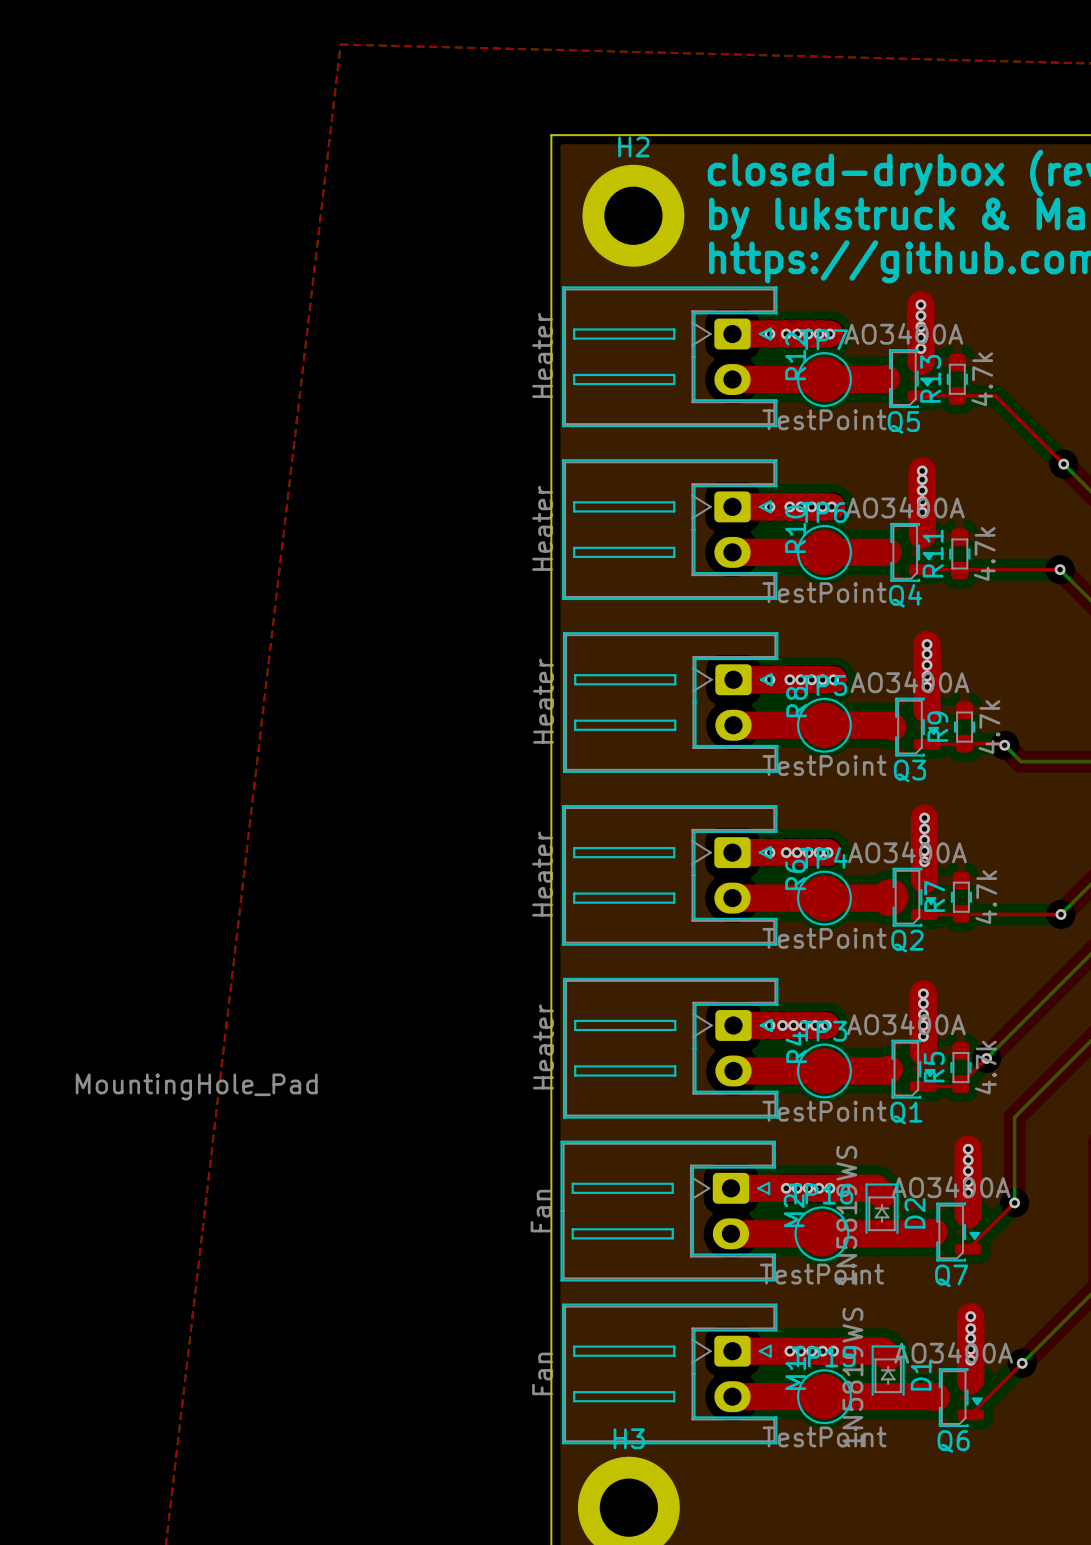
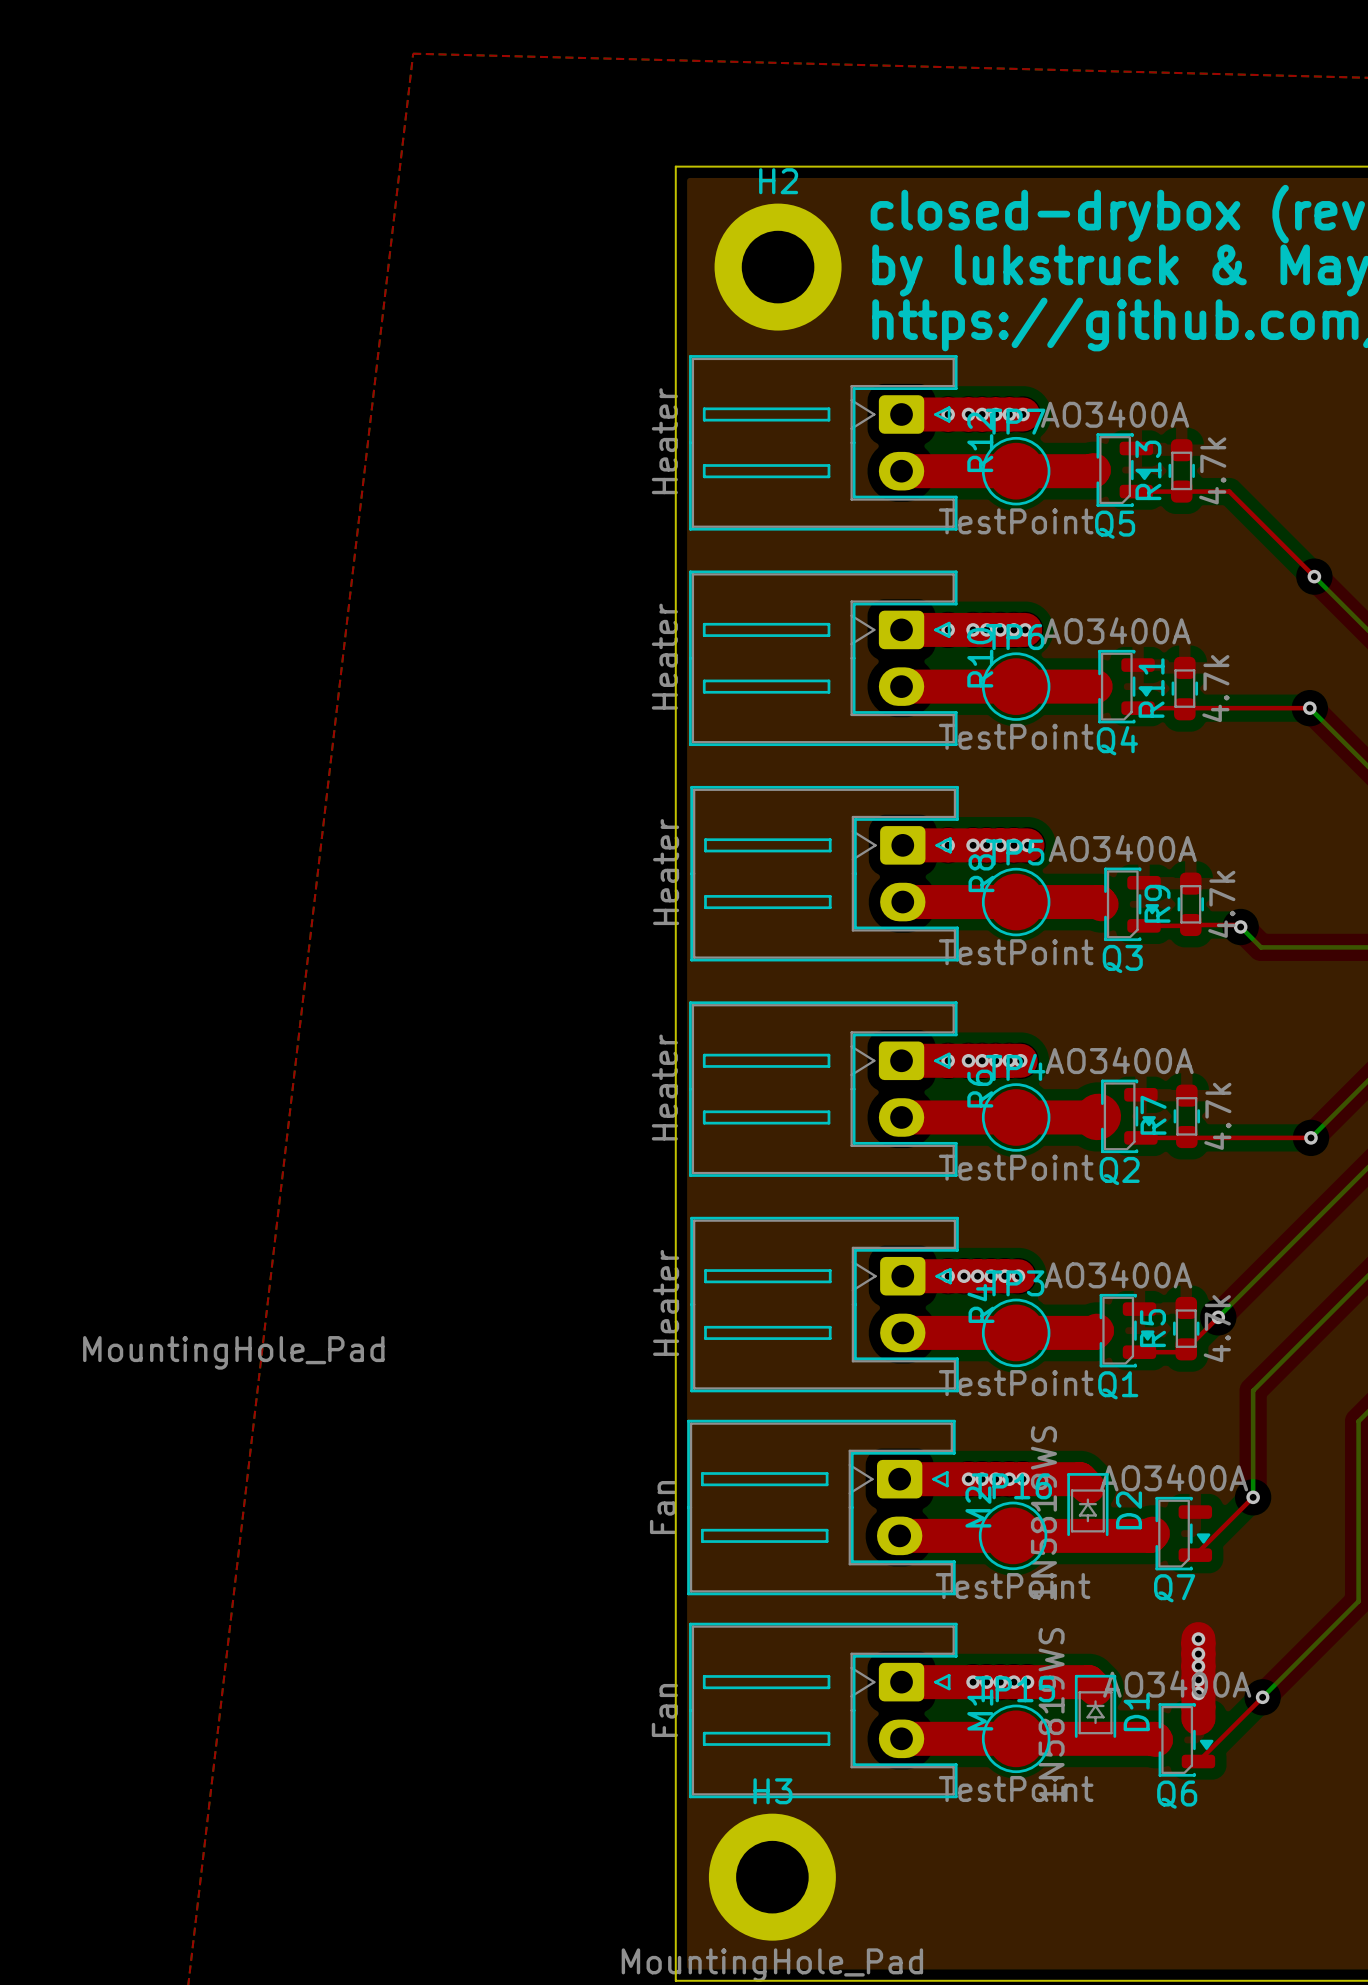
top track: (920, 304) (920, 361) -> none
via: (920, 304) -> none
via: (920, 315) -> none
via: (920, 326) -> none
via: (920, 337) -> none
via: (920, 348) -> none
top track: (922, 470) (922, 535) -> none
via: (922, 470) -> none
via: (922, 479) -> none
via: (922, 490) -> none
via: (922, 501) -> none
via: (922, 512) -> none
top track: (927, 644) (927, 709) -> none
via: (927, 644) -> none
via: (927, 654) -> none
via: (927, 665) -> none
via: (927, 676) -> none
via: (927, 687) -> none
top track: (924, 818) (924, 879) -> none
via: (924, 818) -> none
via: (924, 828) -> none
via: (924, 839) -> none
via: (924, 850) -> none
via: (924, 861) -> none
top track: (923, 993) (923, 1051) -> none
via: (923, 993) -> none
via: (923, 1003) -> none
via: (923, 1014) -> none
via: (923, 1025) -> none
via: (923, 1036) -> none
top track: (968, 1149) (968, 1214) -> none
via: (968, 1149) -> none
via: (968, 1160) -> none
via: (968, 1171) -> none
via: (968, 1181) -> none
via: (968, 1192) -> none

